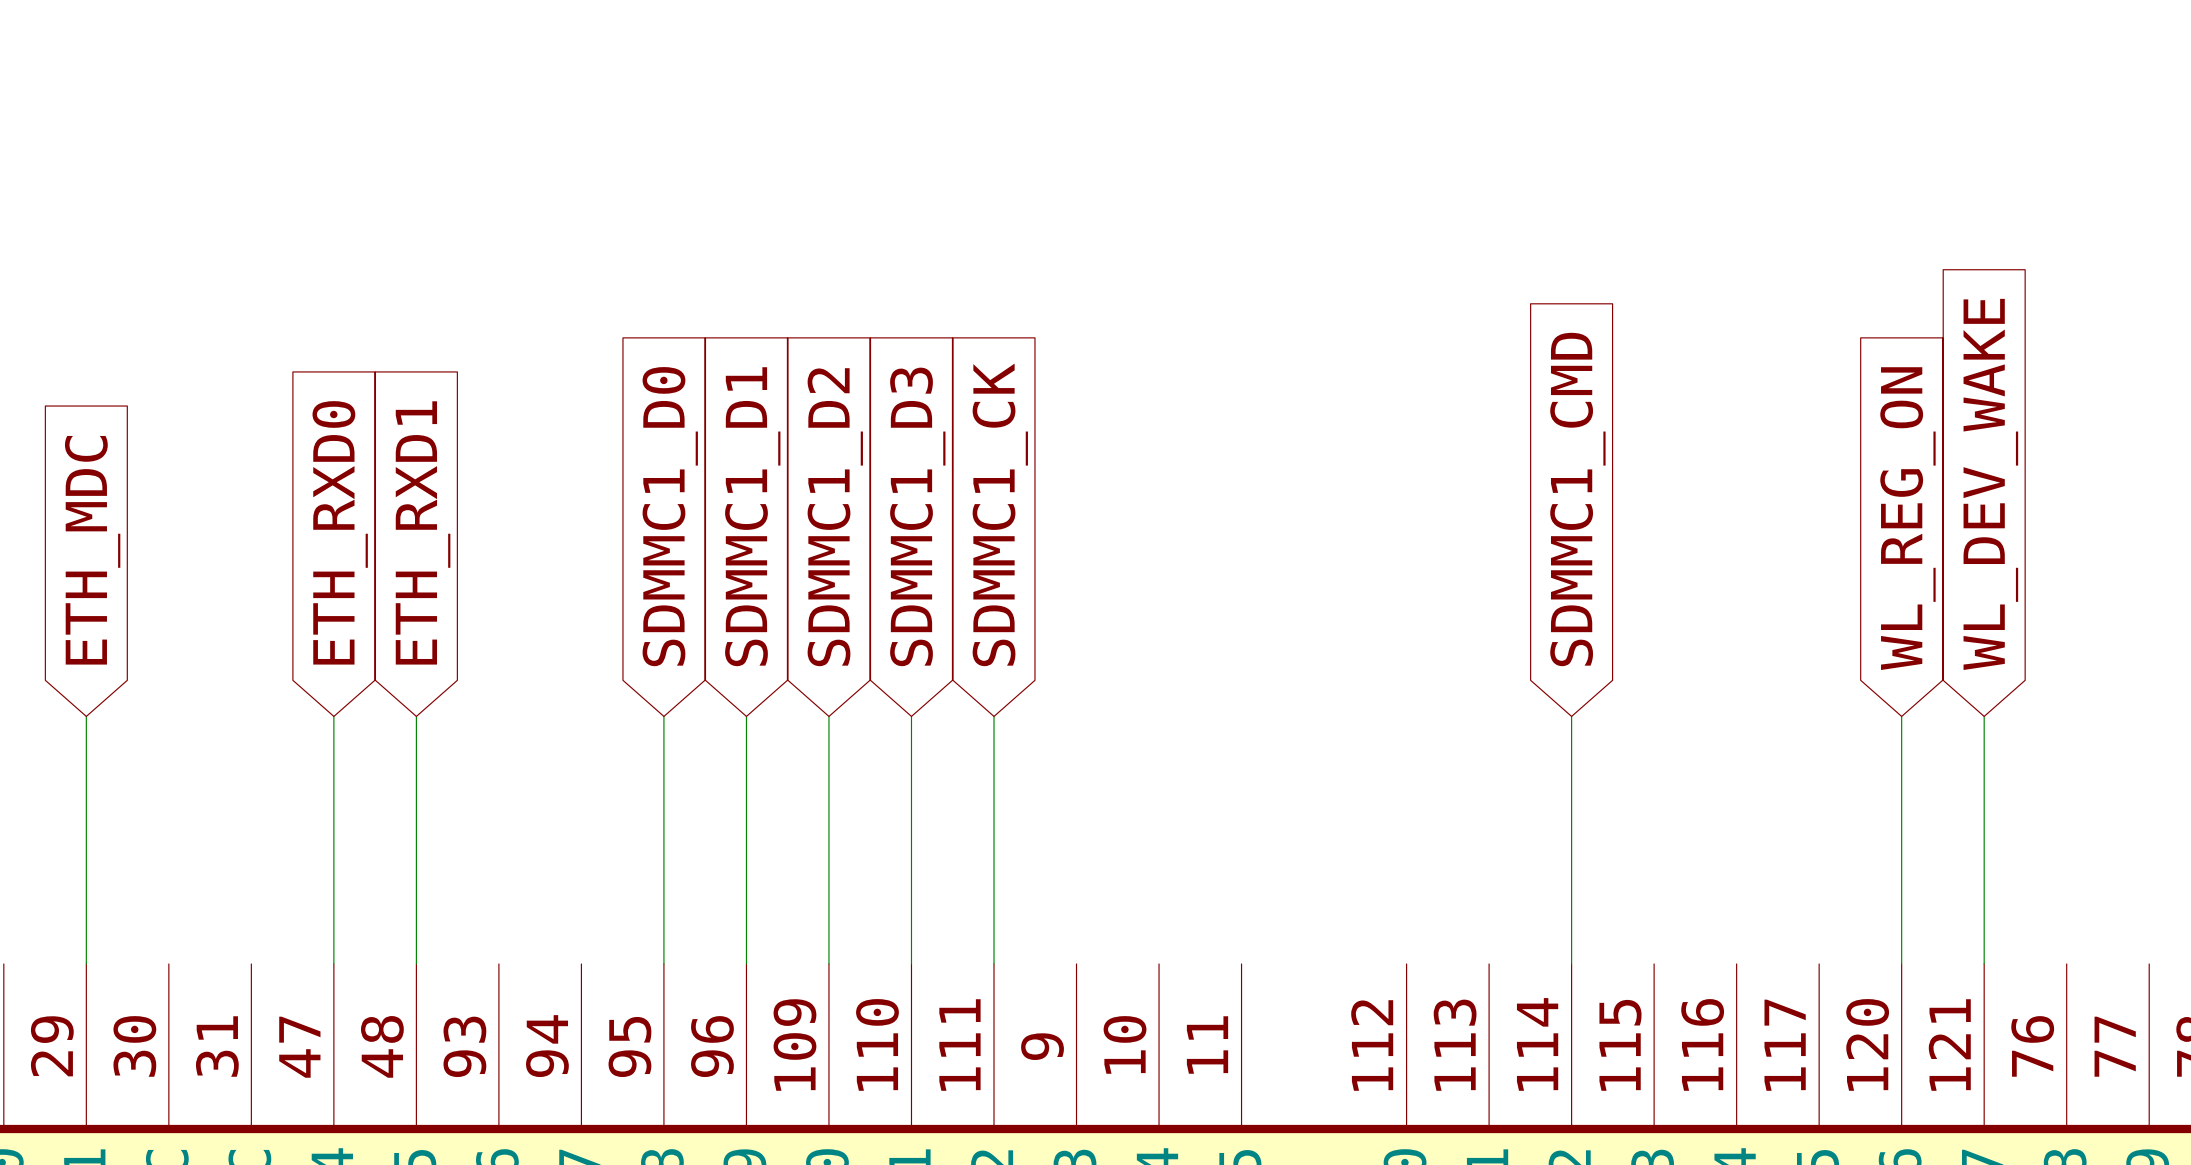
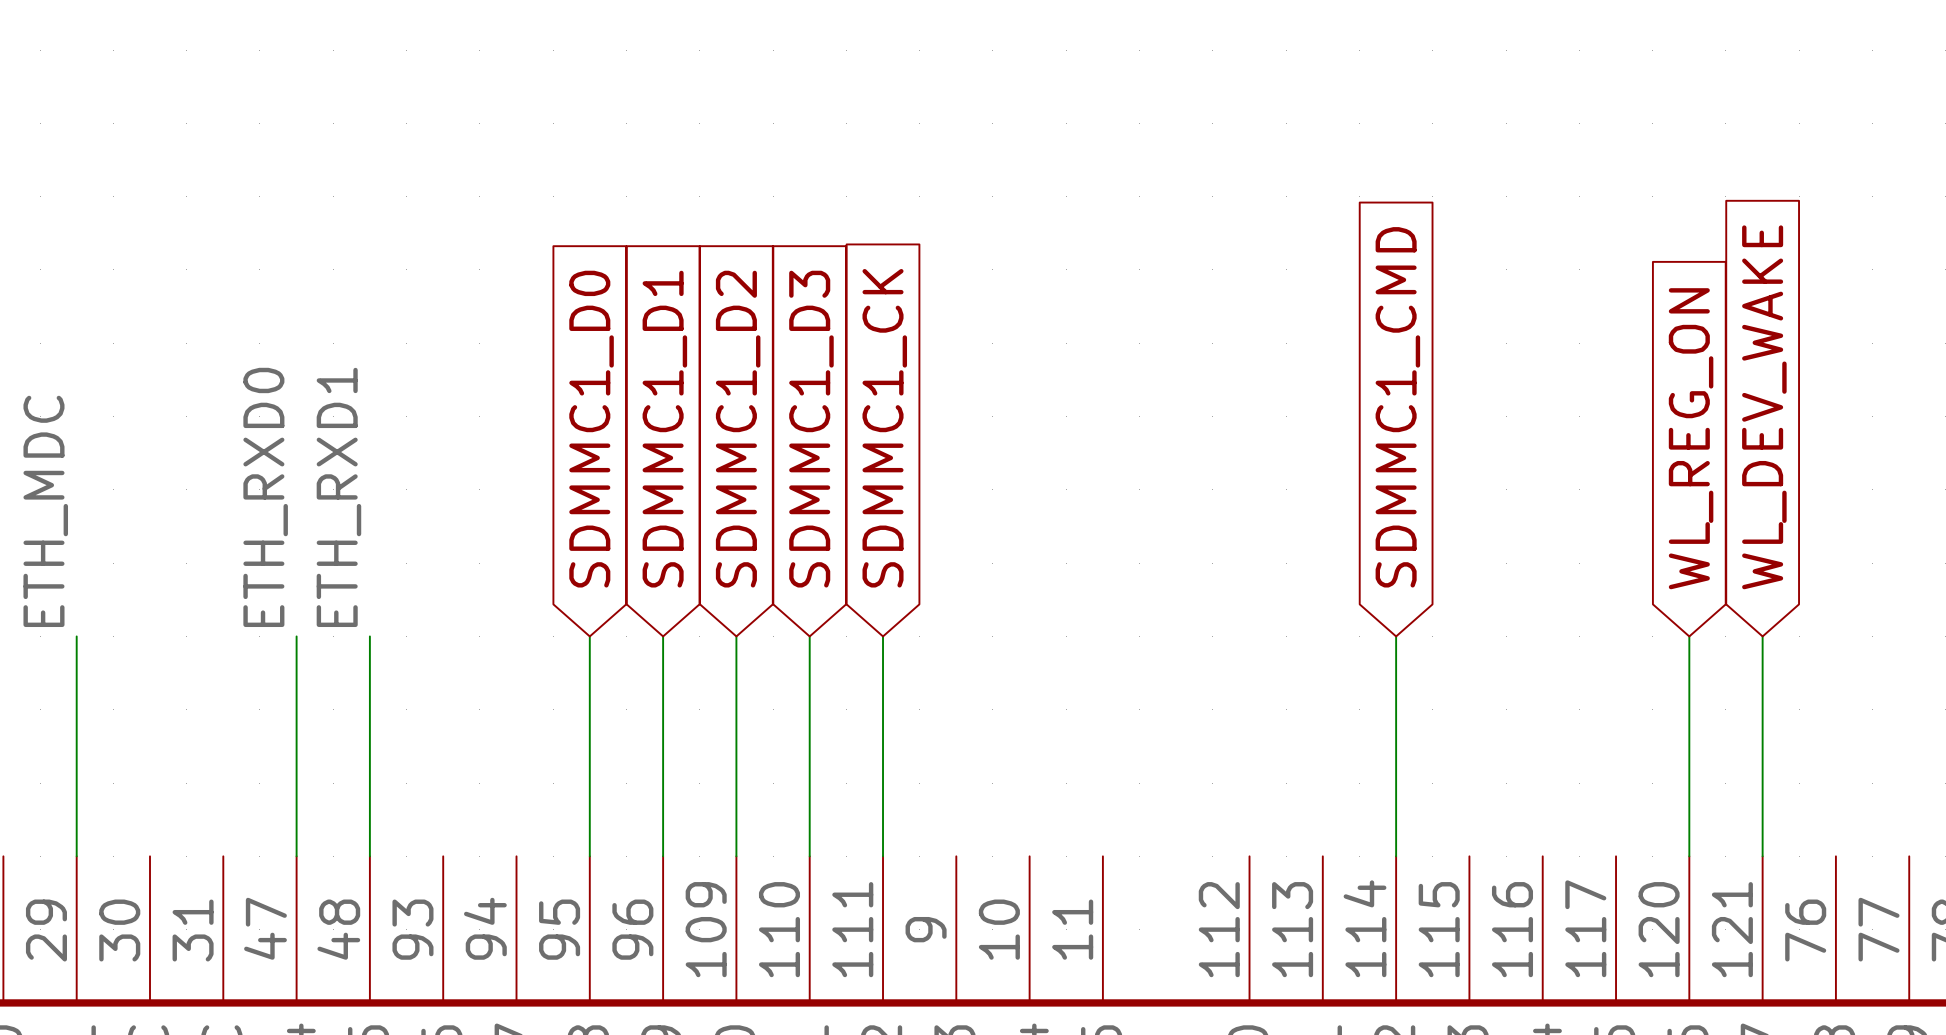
global label: ETH_RXD0 (340, 532) -> none
global label: ETH_RXD1 (423, 532) -> none
global label: ETH_MDC (92, 550) -> none
label: none -> ETH_RXD0 (265, 497)
label: none -> ETH_RXD1 (338, 497)
label: none -> ETH_MDC (45, 511)

